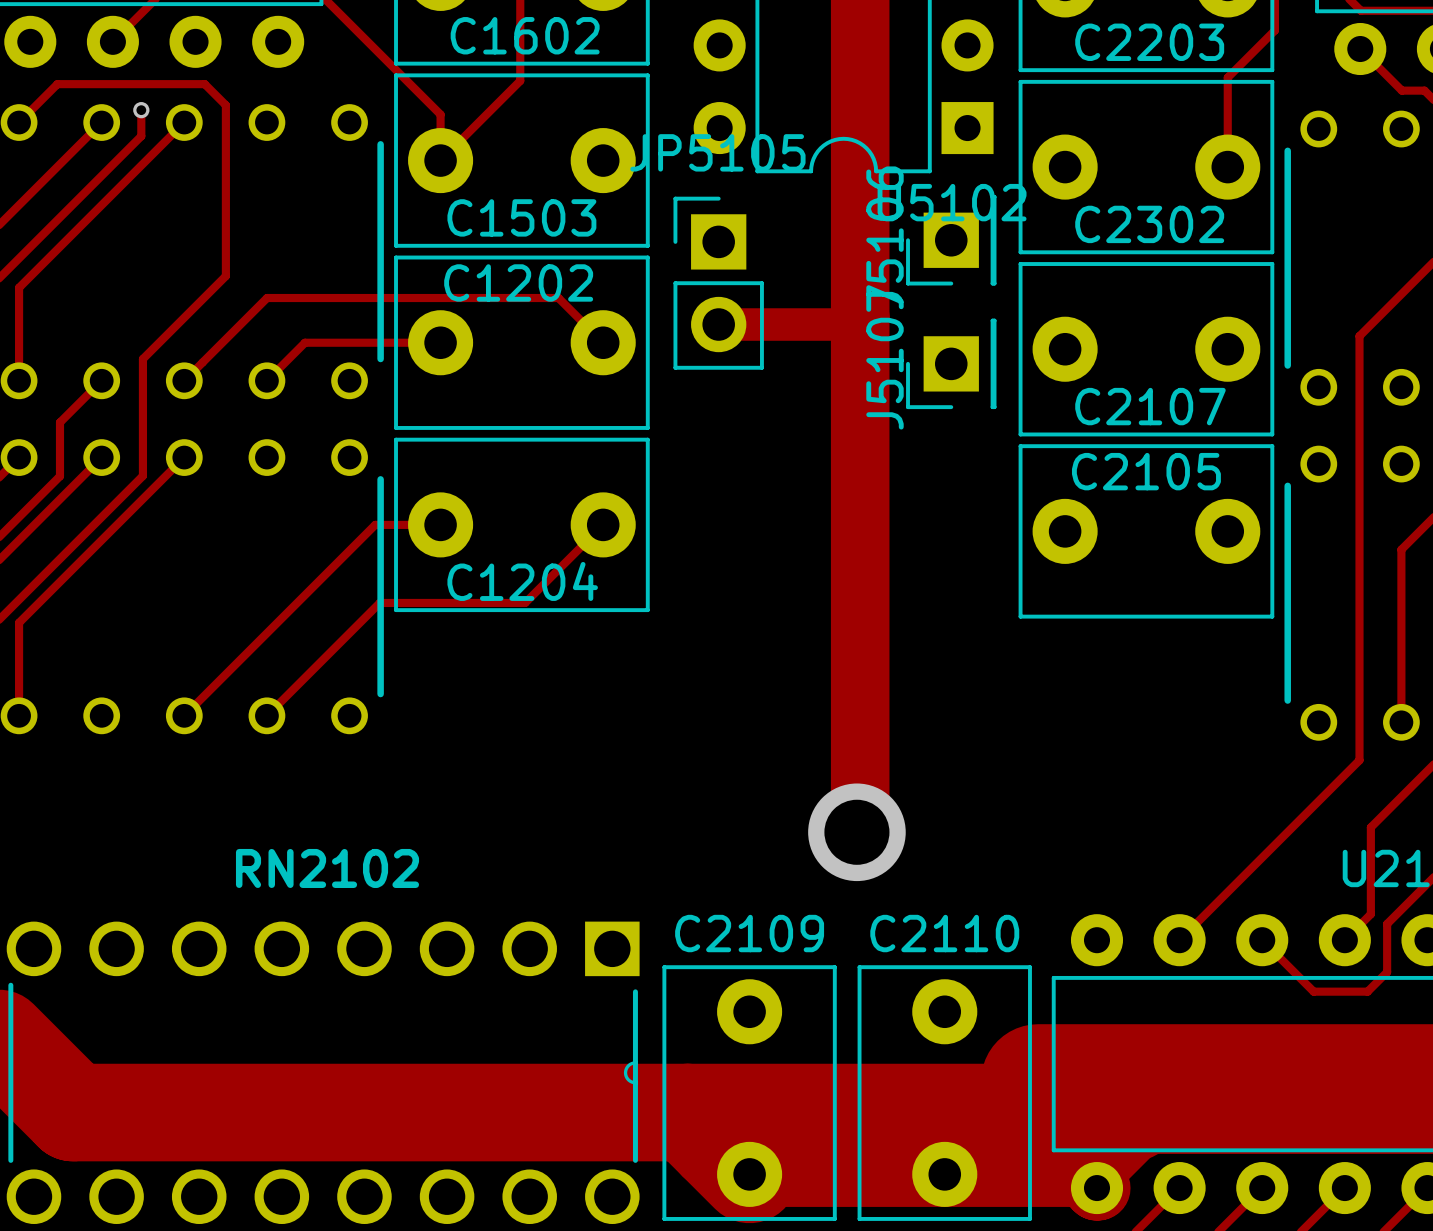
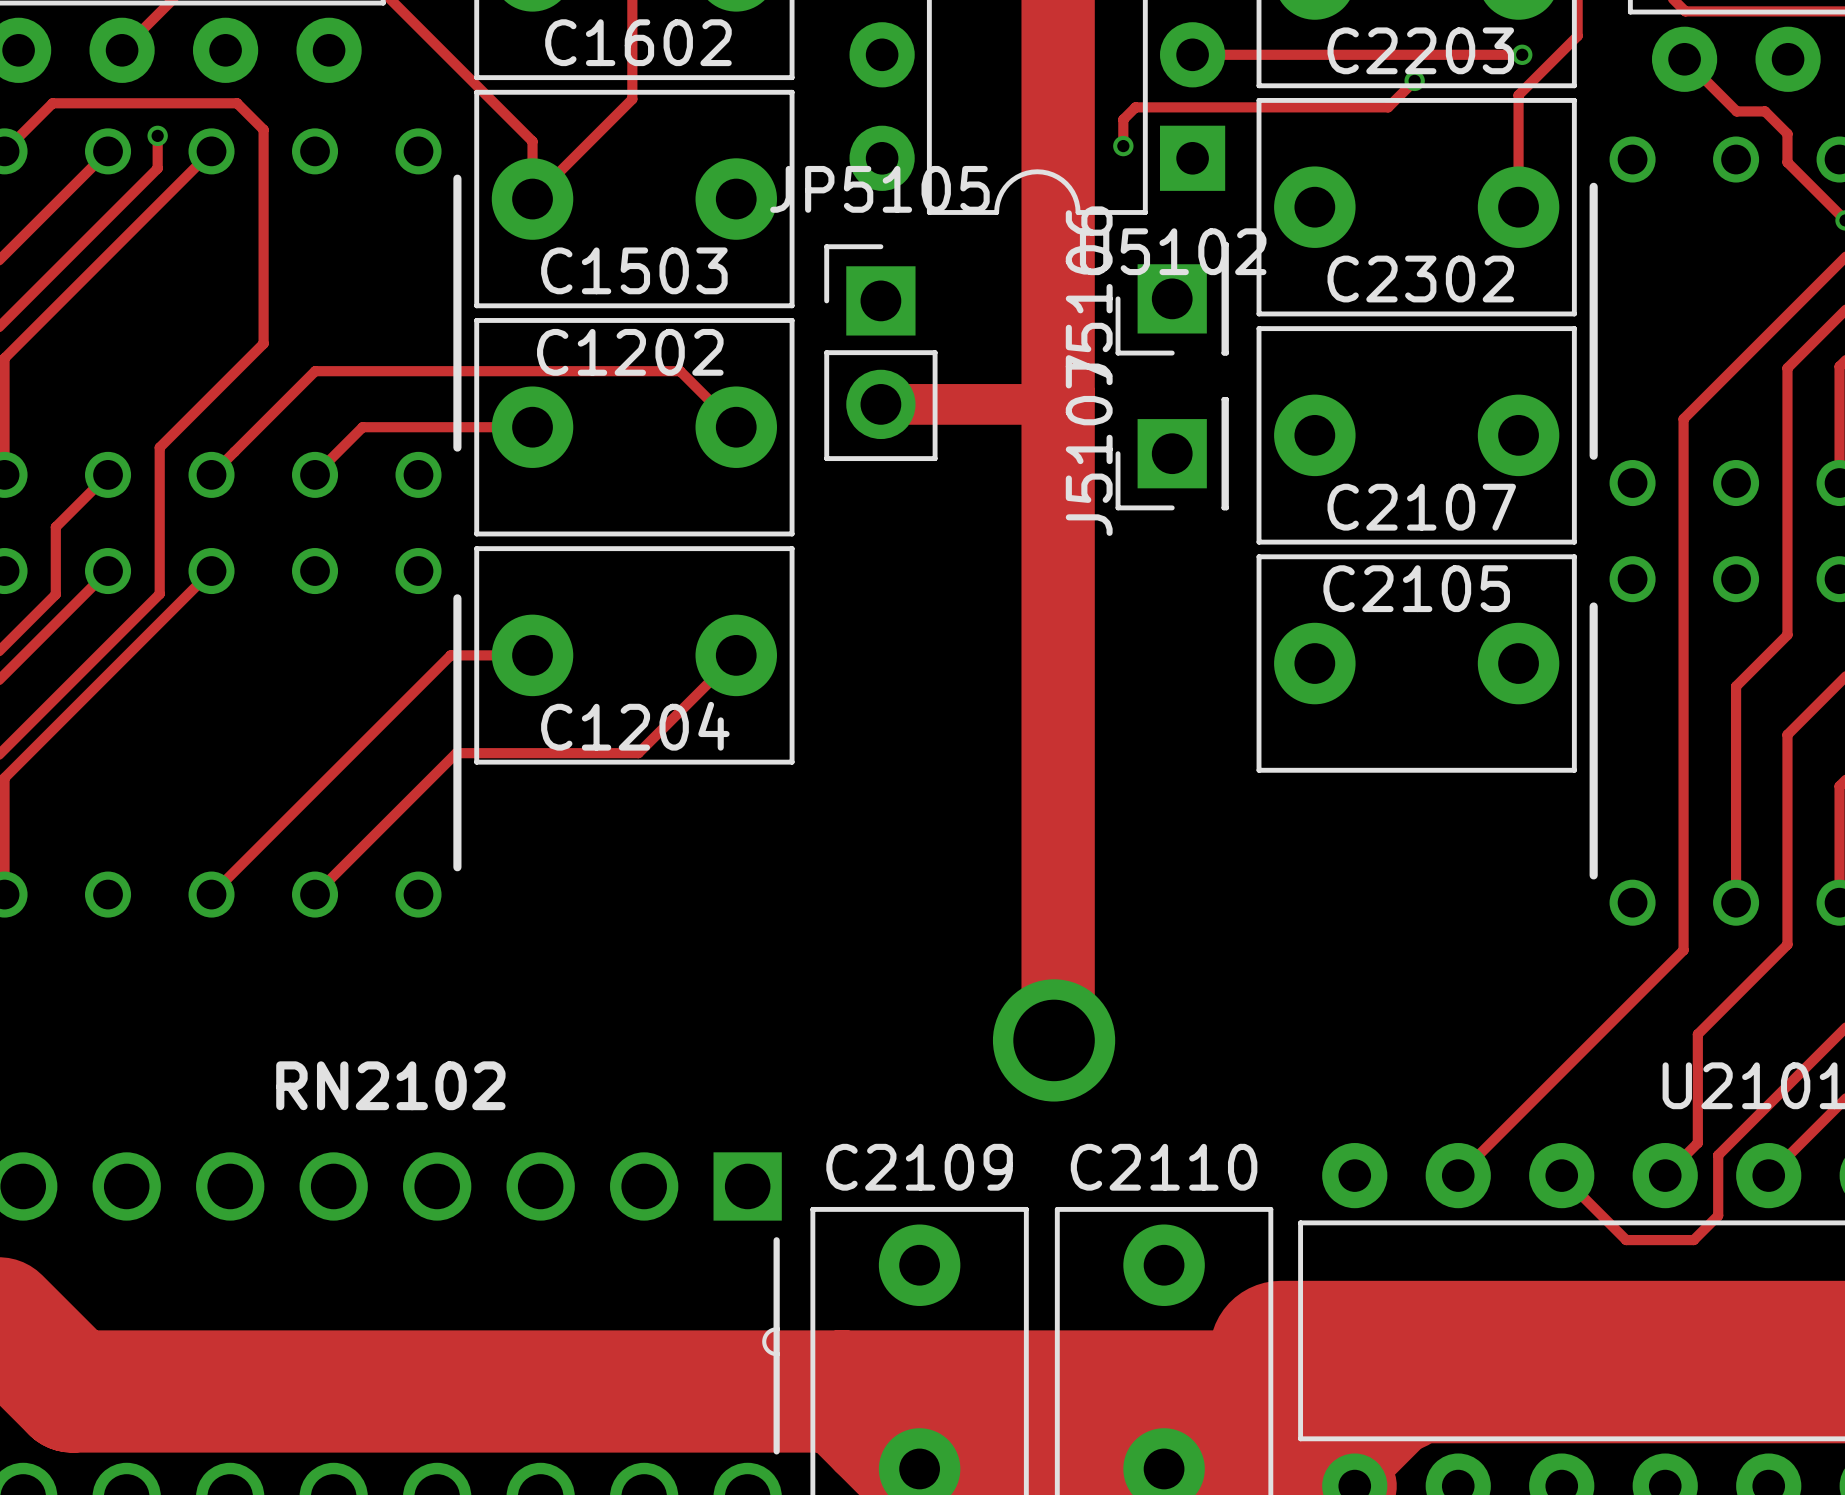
track: none -> (1192, 54) (1522, 54)
via: none -> (1522, 54)
track: none -> (1414, 80) (1388, 107) (1135, 107) (1123, 119) (1123, 146)
via: none -> (1414, 80)
via: none -> (1123, 146)

